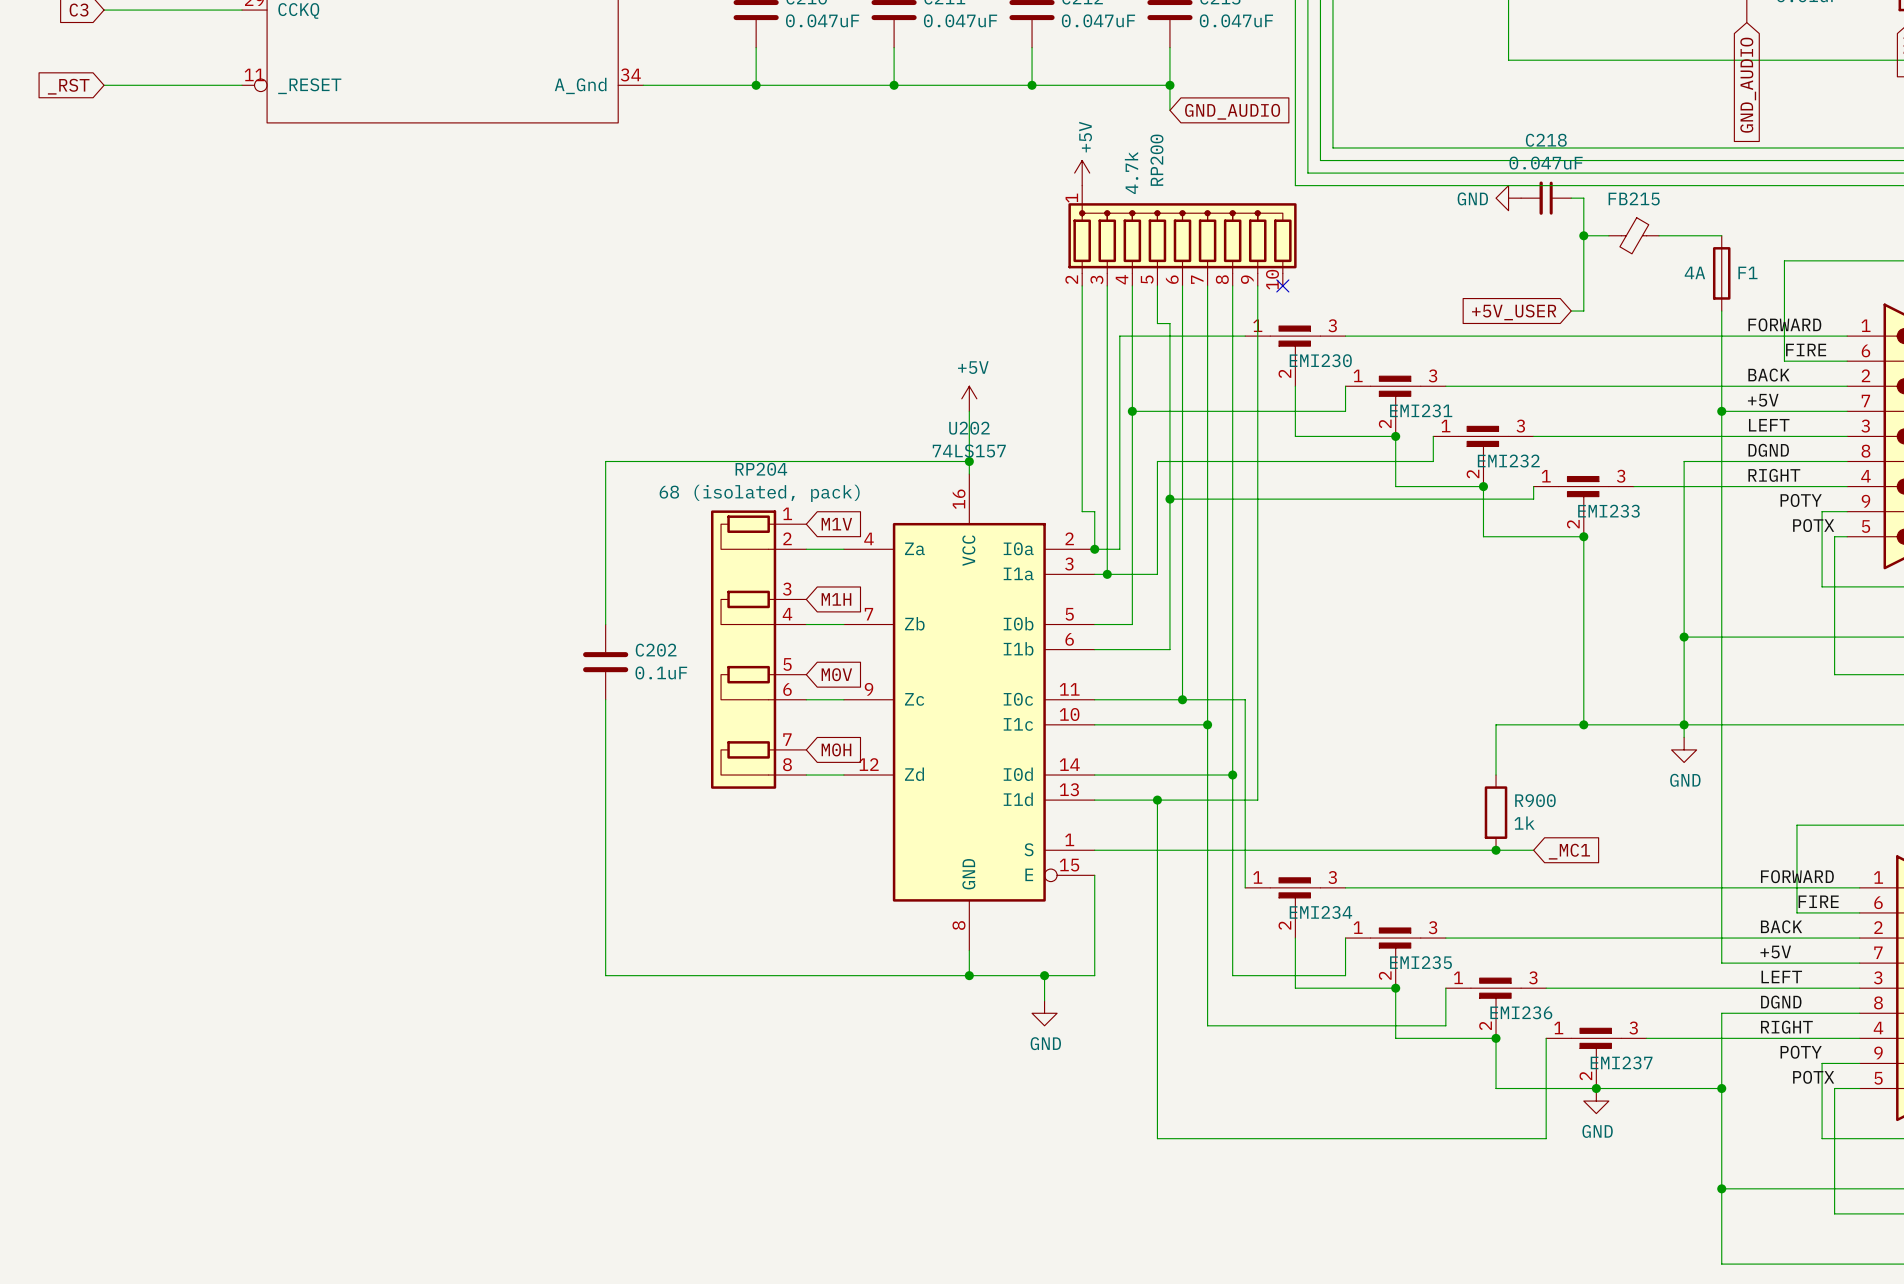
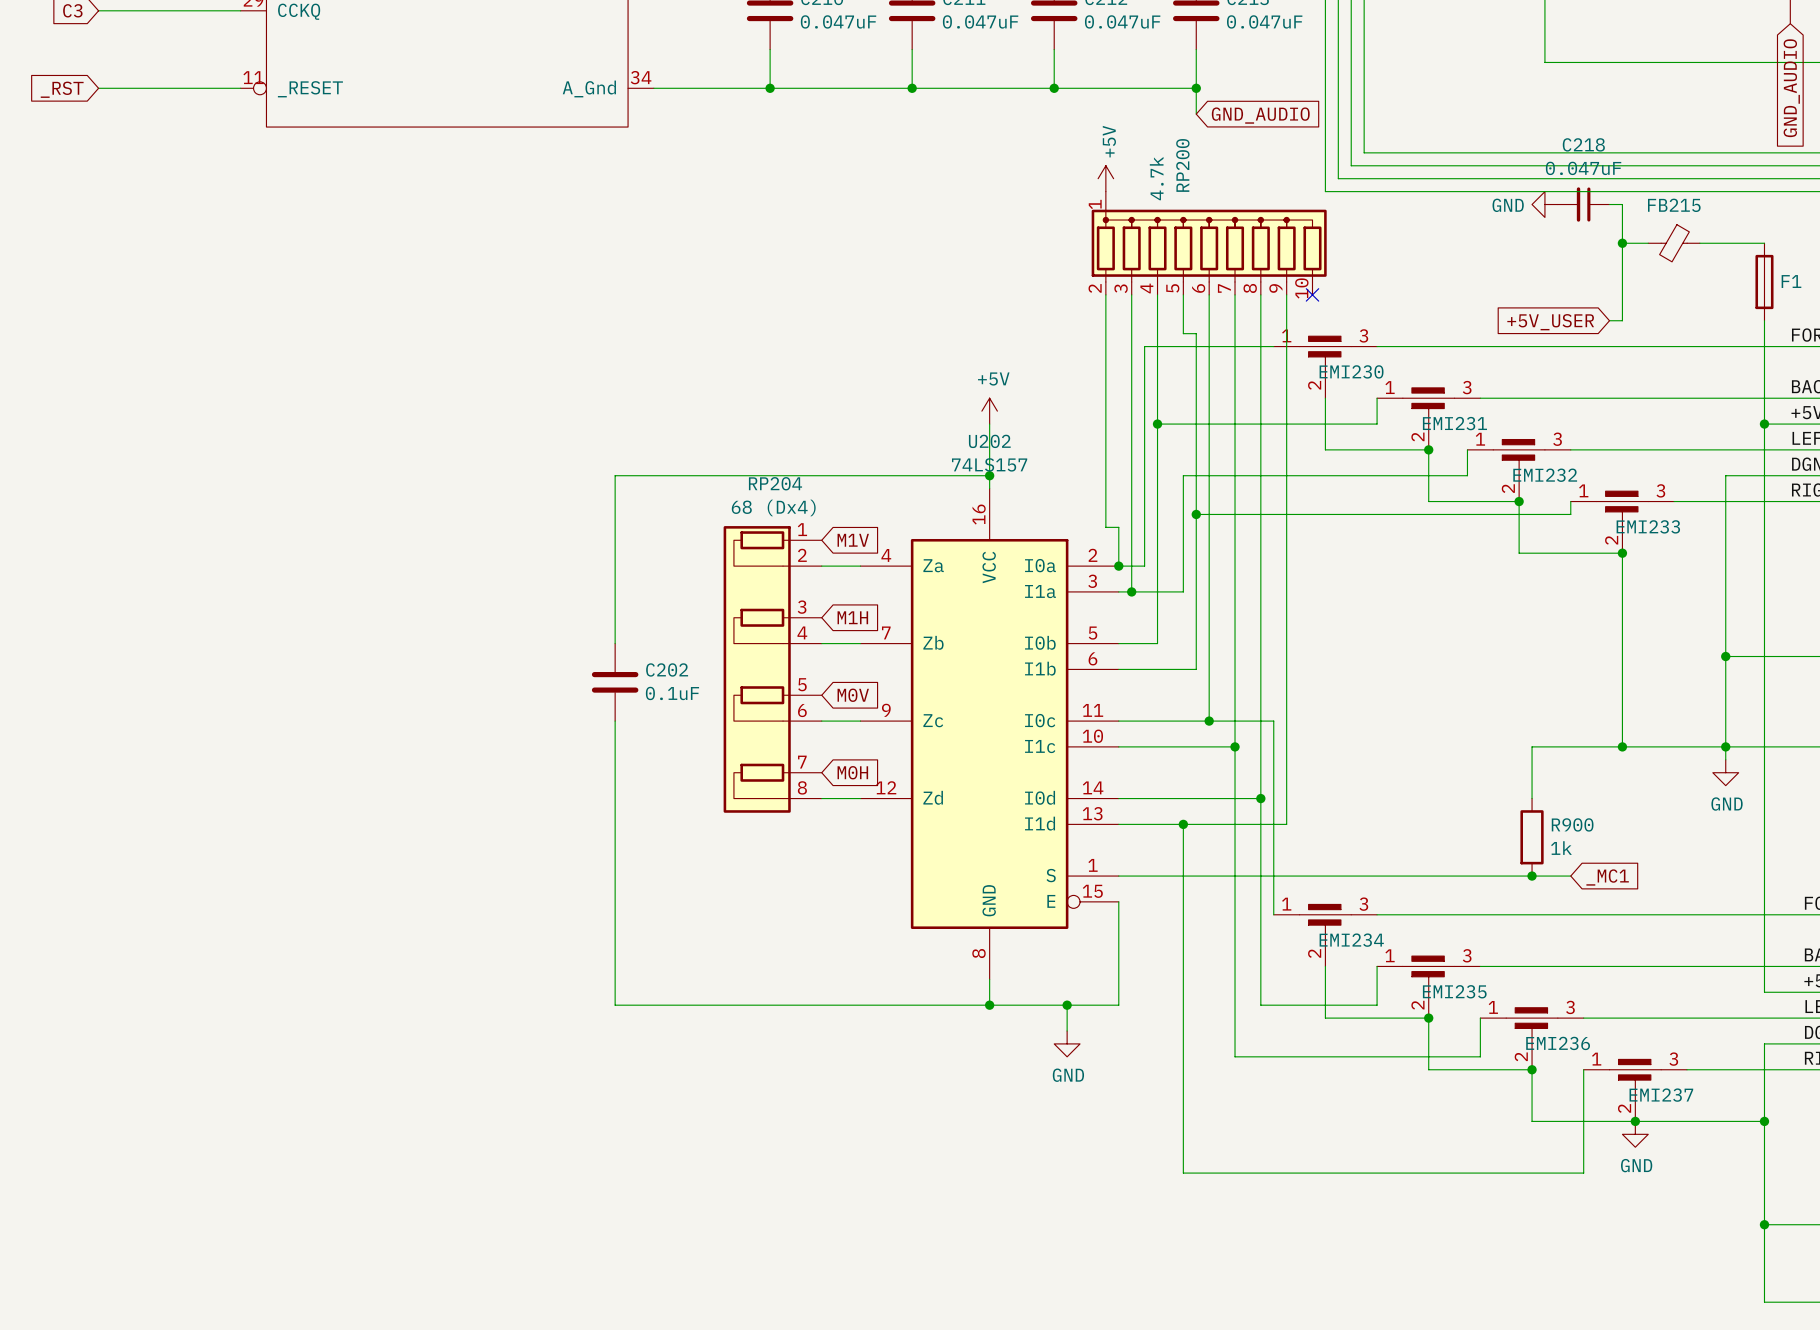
F1 value: 4A (1694, 272) -> none
RP204 value: 68 (isolated, pack) (759, 493) -> 68 (Dx4) (773, 507)

